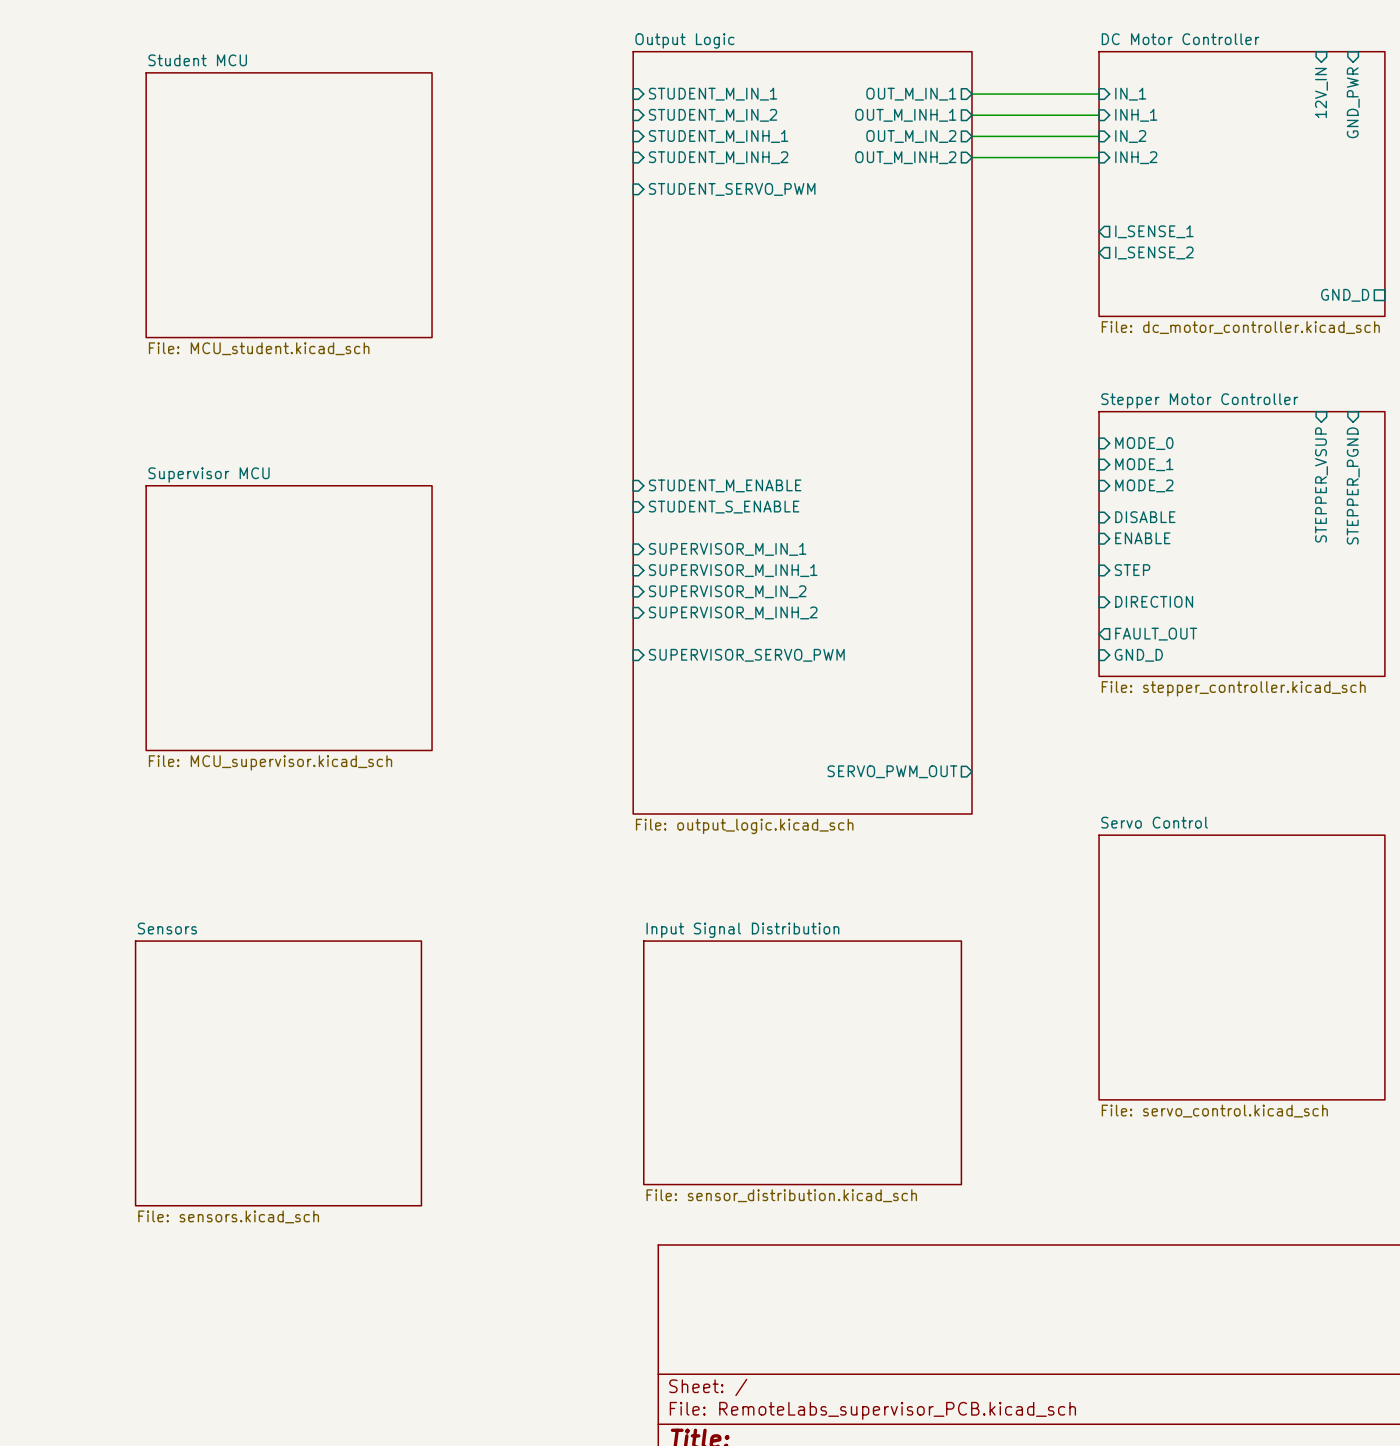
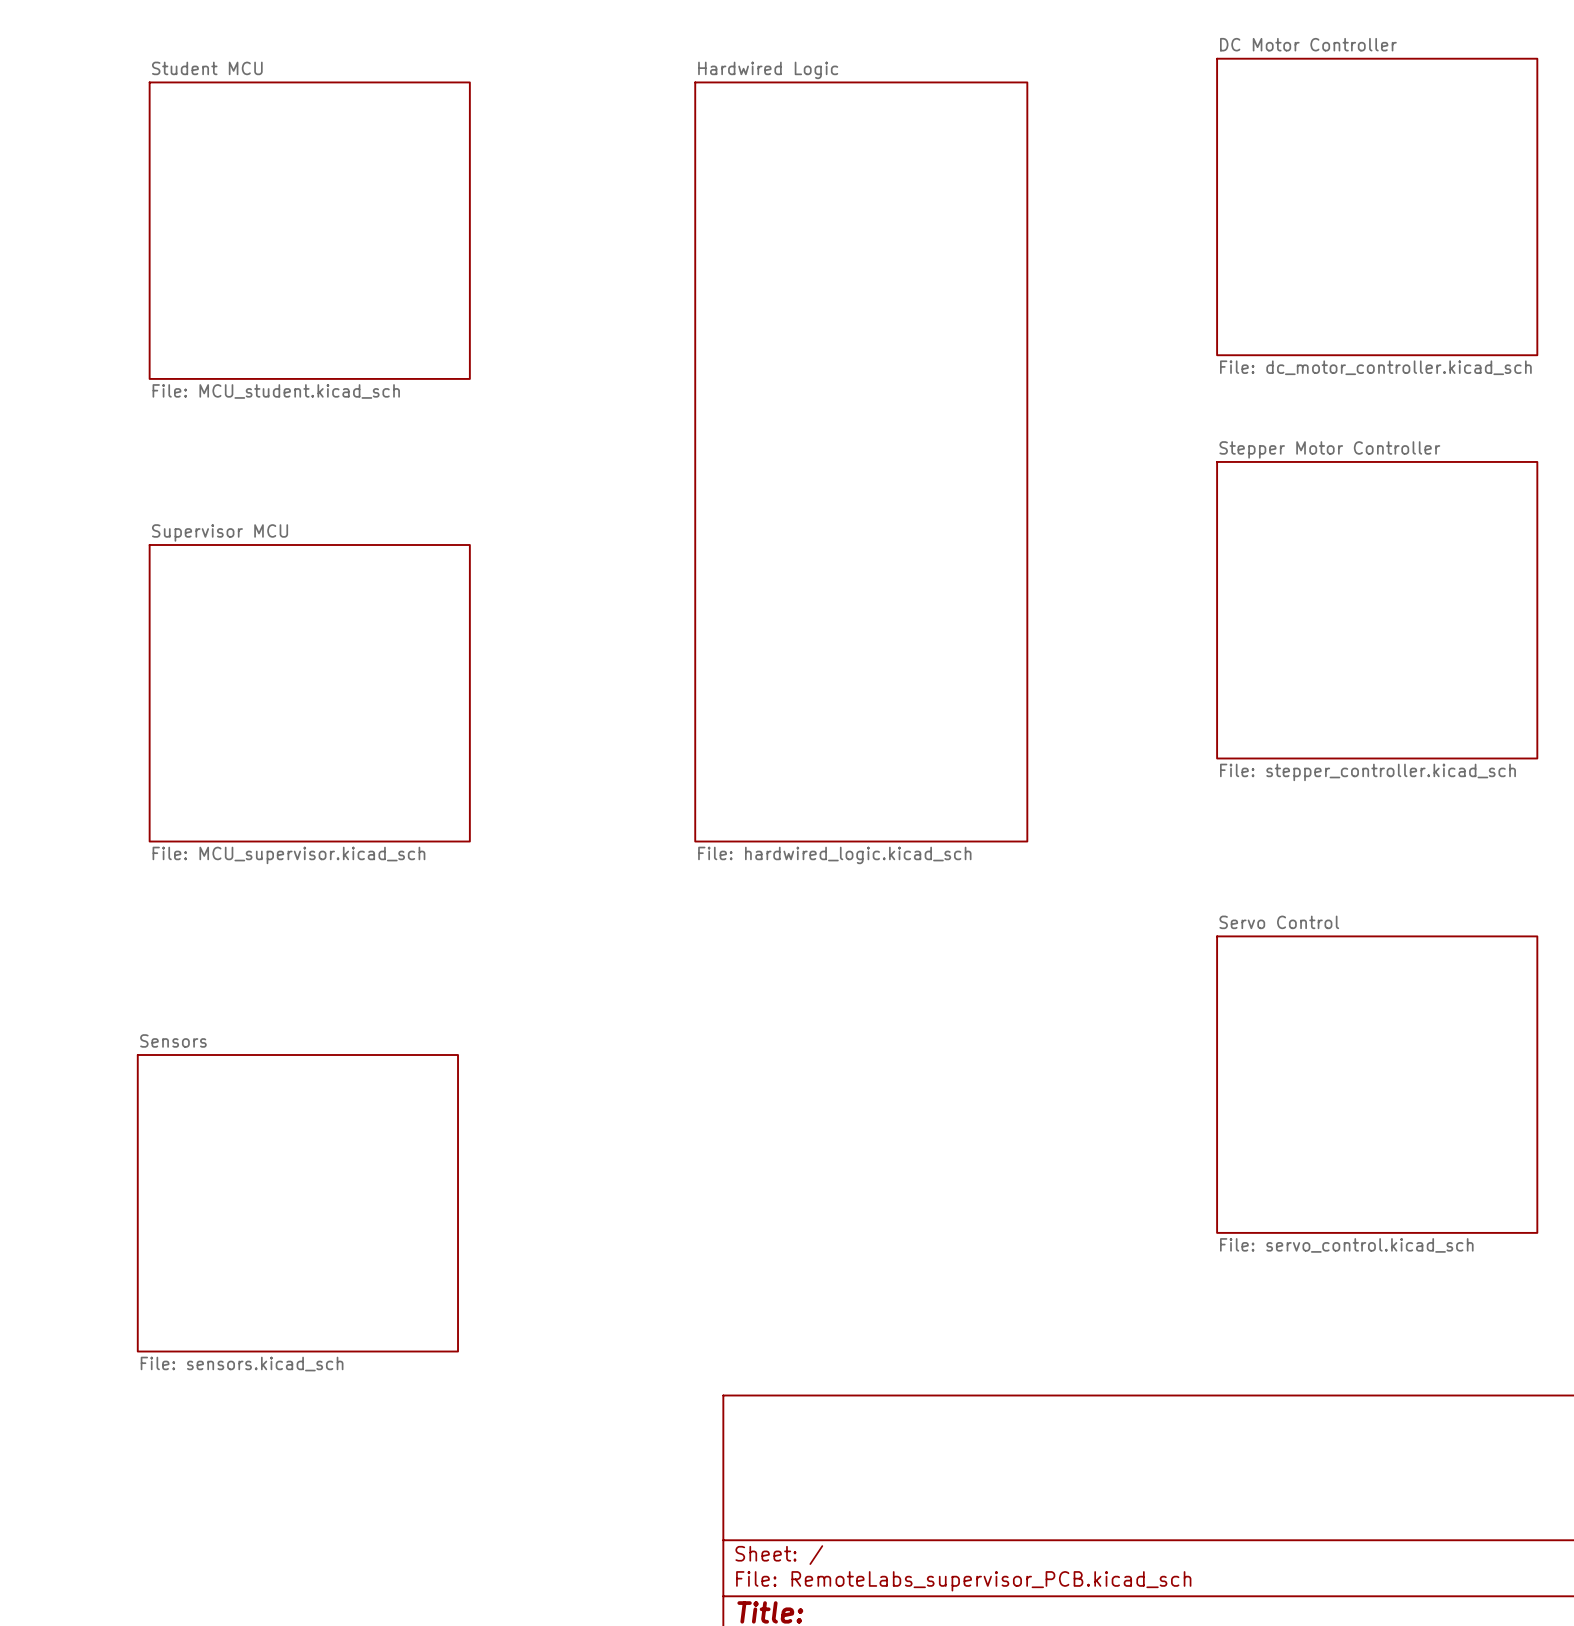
sheet pin: 12V_IN (1321, 92) -> none
sheet pin: STUDENT_M_IN_1 (713, 94) -> none
sheet pin: OUT_M_IN_1 (911, 94) -> none
wire: (971, 94) (1099, 94) -> none
sheet pin: IN_1 (1130, 94) -> none
sheet pin: GND_PWR (1353, 102) -> none
sheet pin: STUDENT_M_IN_2 (713, 115) -> none
sheet pin: OUT_M_INH_1 (905, 115) -> none
wire: (971, 115) (1099, 115) -> none
sheet pin: INH_1 (1136, 115) -> none
sheet pin: STUDENT_M_INH_1 (718, 136) -> none
sheet pin: OUT_M_IN_2 (911, 136) -> none
wire: (971, 136) (1099, 136) -> none
sheet pin: IN_2 (1130, 136) -> none
sheet pin: STUDENT_M_INH_2 (718, 157) -> none
sheet pin: OUT_M_INH_2 (905, 157) -> none
wire: (971, 157) (1099, 157) -> none
sheet pin: INH_2 (1136, 157) -> none
sheet pin: STUDENT_SERVO_PWM (732, 189) -> none
sheet pin: I_SENSE_1 (1154, 231) -> none
sheet pin: I_SENSE_2 (1154, 252) -> none
sheet pin: GND_D (1345, 295) -> none
sheet Hardwired Logic: none -> File: hardwired_logic.kicad_sch (861, 461)
sheet Output Logic: File: output_logic.kicad_sch (802, 432) -> none
sheet pin: MODE_0 (1144, 443) -> none
sheet pin: MODE_1 (1144, 464) -> none
sheet pin: STEPPER_VSUP (1321, 484) -> none
sheet pin: STUDENT_M_ENABLE (725, 485) -> none
sheet pin: MODE_2 (1144, 485) -> none
sheet pin: STEPPER_PGND (1353, 485) -> none
sheet pin: STUDENT_S_ENABLE (724, 507) -> none
sheet pin: DISABLE (1145, 517) -> none
sheet pin: ENABLE (1142, 538) -> none
sheet pin: SUPERVISOR_M_IN_1 (727, 549) -> none
sheet pin: SUPERVISOR_M_INH_1 (733, 570) -> none
sheet pin: STEP (1132, 570) -> none
sheet pin: SUPERVISOR_M_IN_2 (727, 591) -> none
sheet pin: DIRECTION (1154, 601) -> none
sheet pin: SUPERVISOR_M_INH_2 (733, 612) -> none
sheet pin: FAULT_OUT (1156, 634) -> none
sheet pin: SUPERVISOR_SERVO_PWM (746, 655) -> none
sheet pin: GND_D (1138, 655) -> none
sheet pin: SERVO_PWM_OUT (892, 771) -> none
sheet Input Signal Distribution: File: sensor_distribution.kicad_sch (802, 1062) -> none

